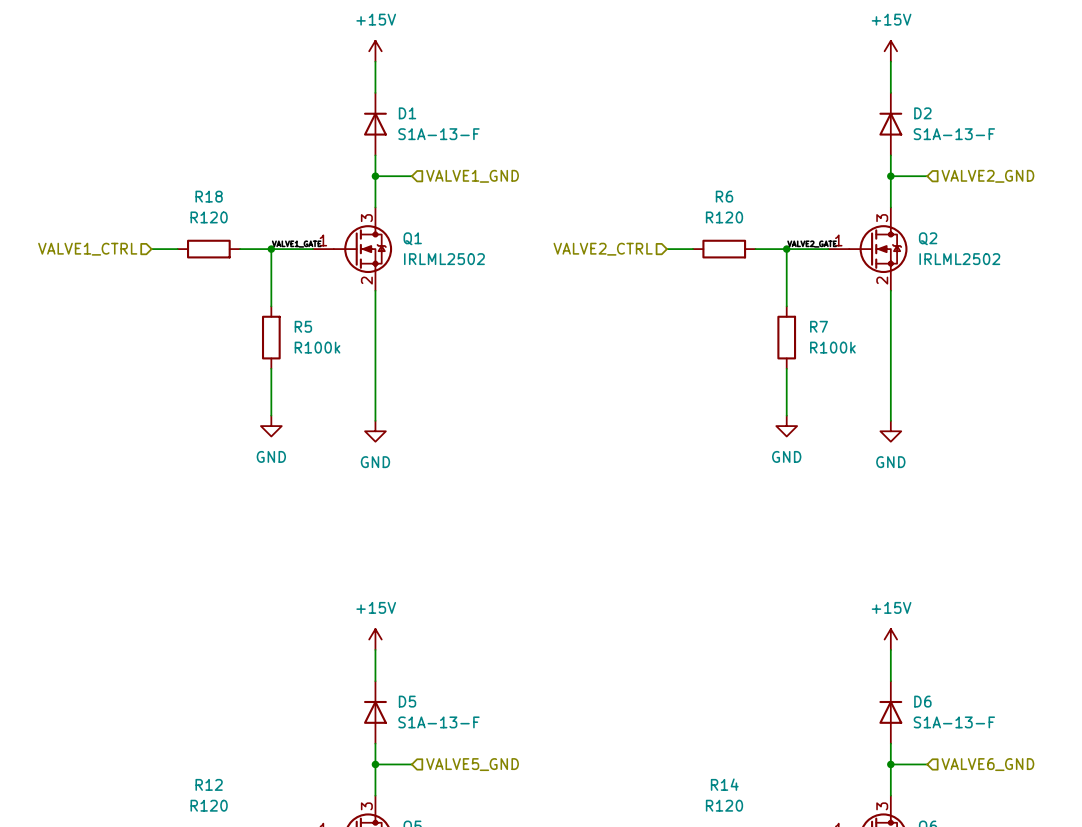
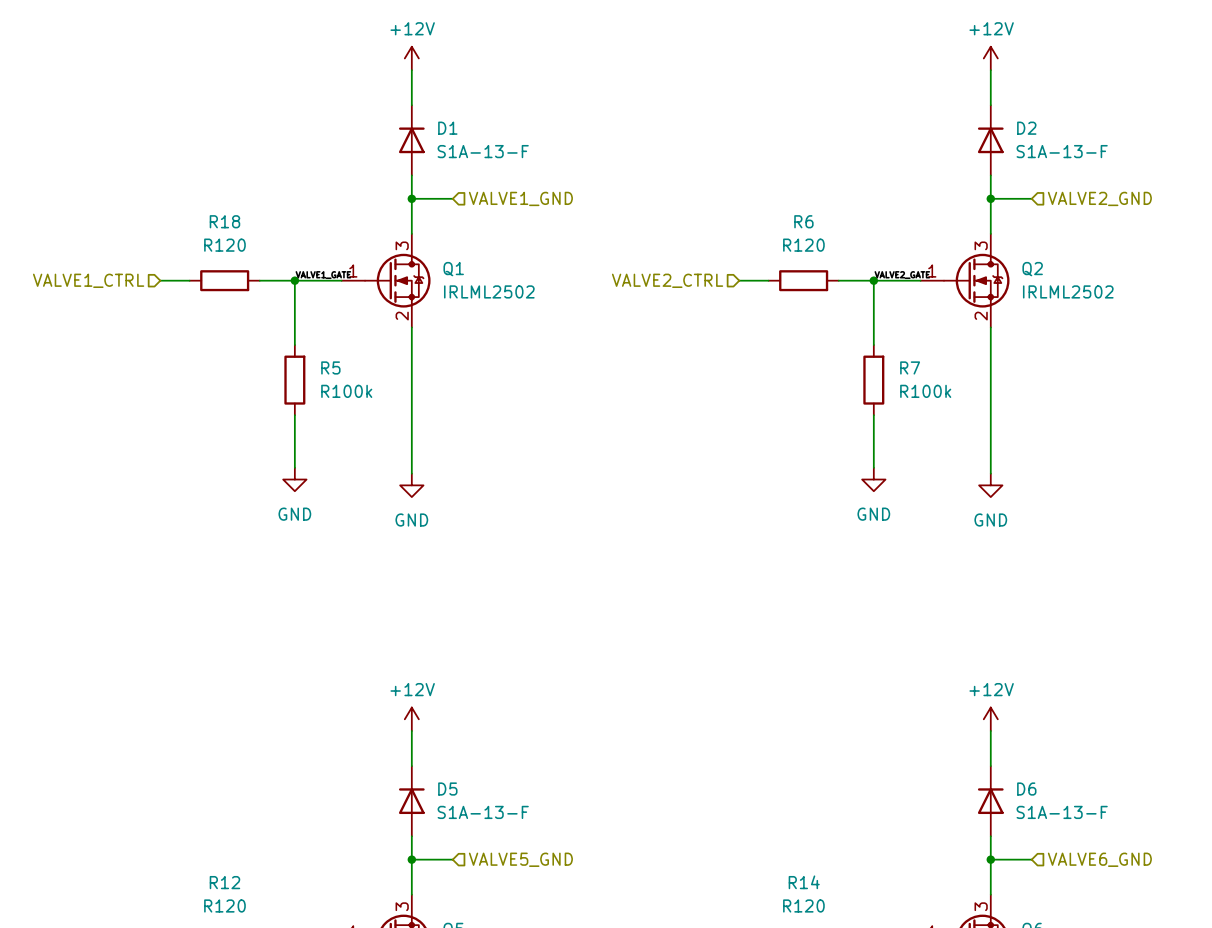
power symbol: +15V (375, 51) -> +12V (411, 58)
power symbol: +15V (890, 51) -> +12V (990, 58)
power symbol: +15V (375, 639) -> +12V (411, 719)
power symbol: +15V (890, 639) -> +12V (990, 719)

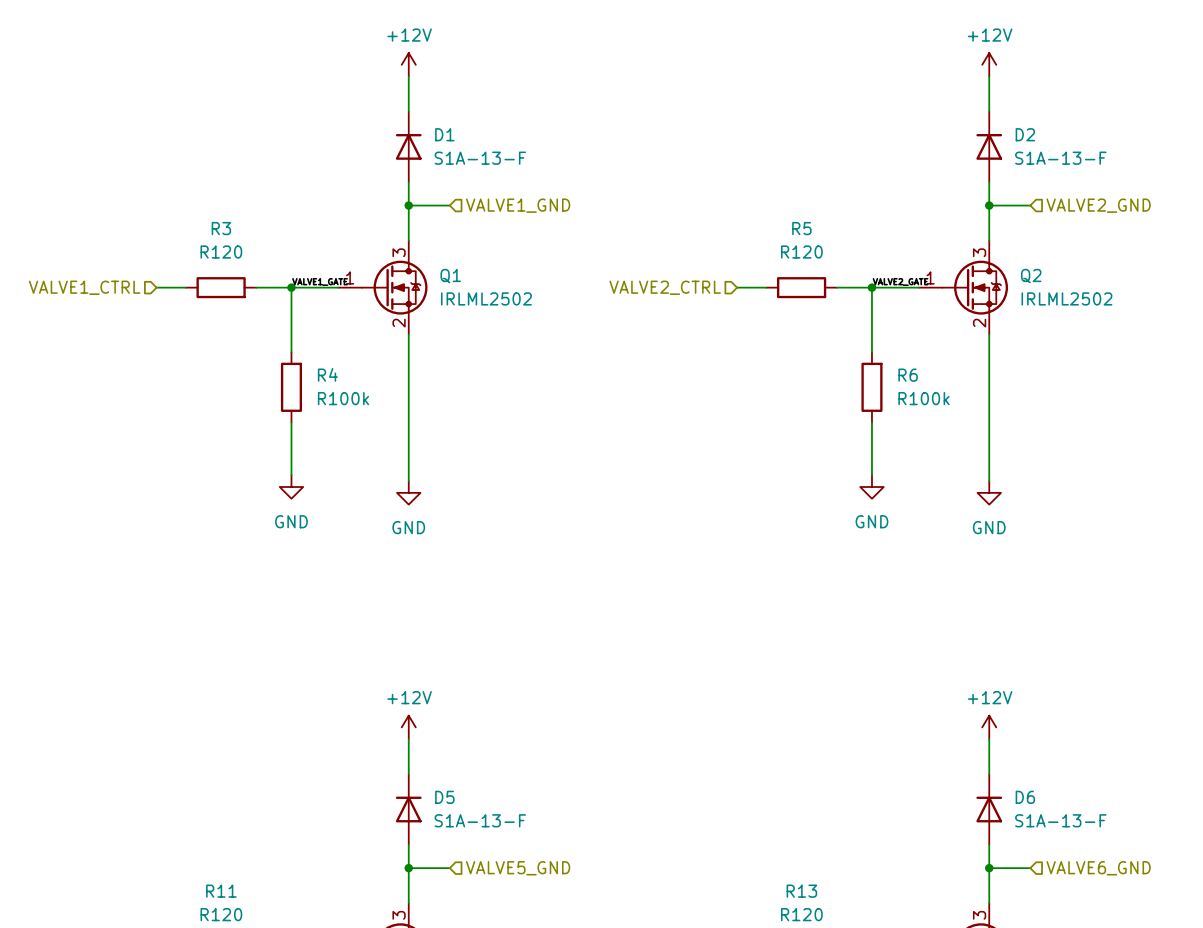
R18 name: R18 (224, 221) -> R3 (221, 228)
R6 name: R6 (803, 221) -> R5 (801, 228)
R5 name: R5 (330, 367) -> R4 (327, 374)
R7 name: R7 (910, 367) -> R6 (908, 375)
R12 name: R12 (224, 882) -> R11 (221, 891)
R14 name: R14 (804, 882) -> R13 (801, 891)

